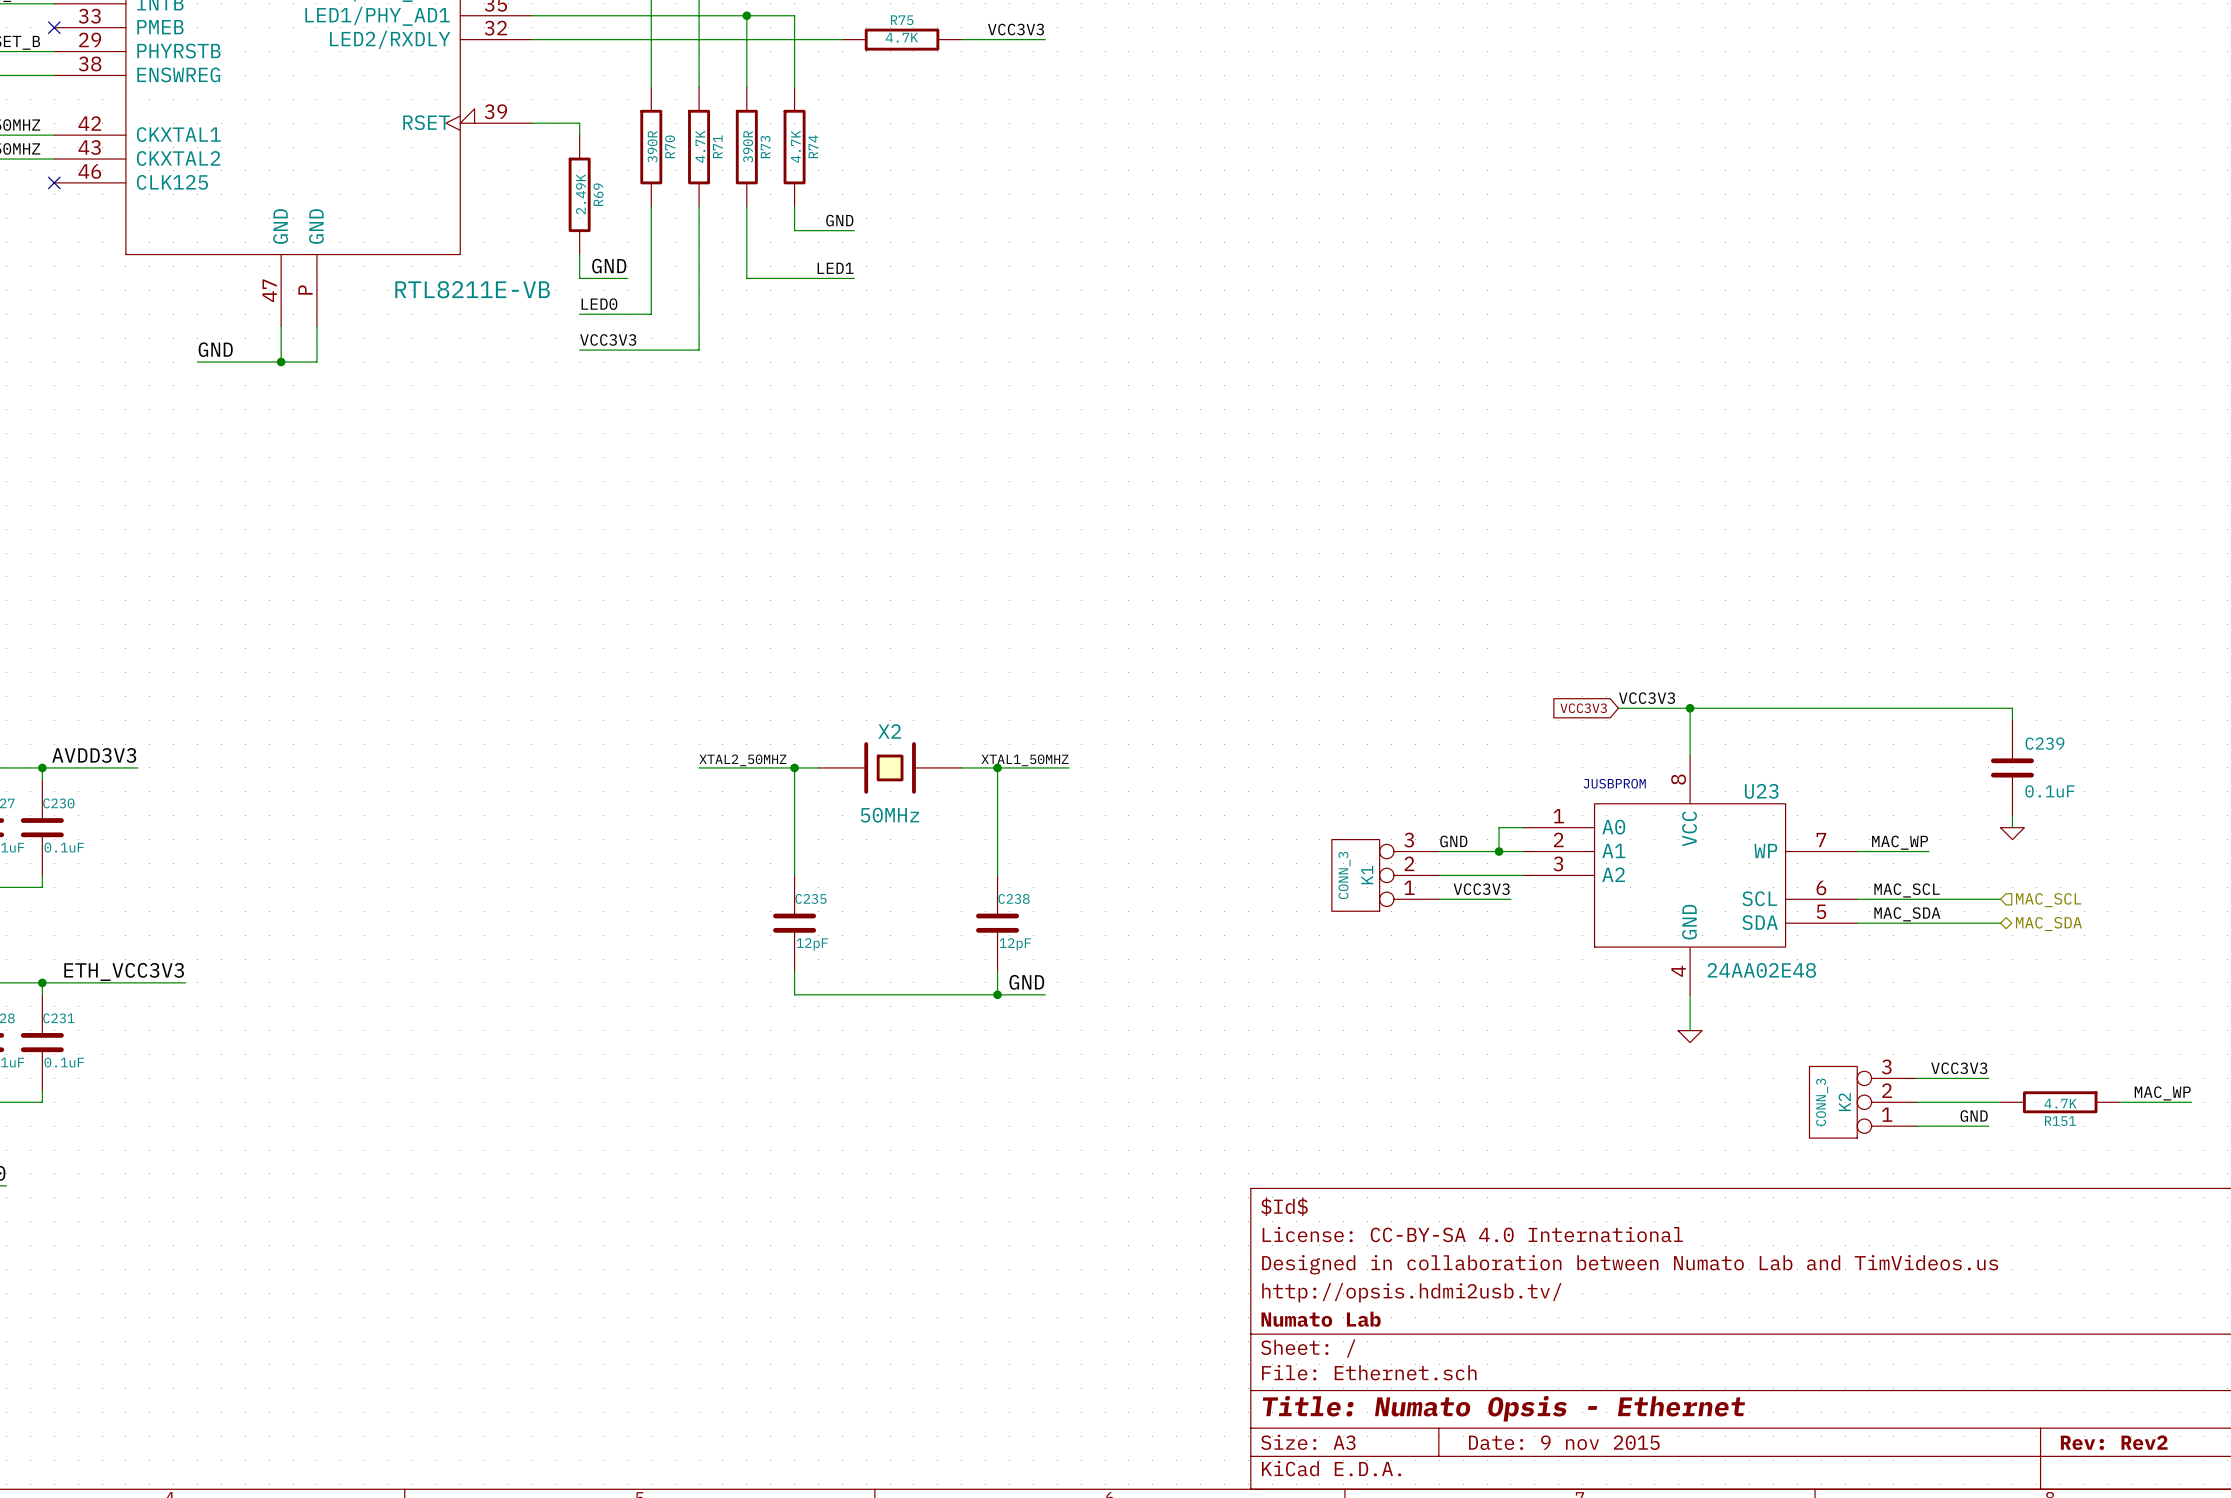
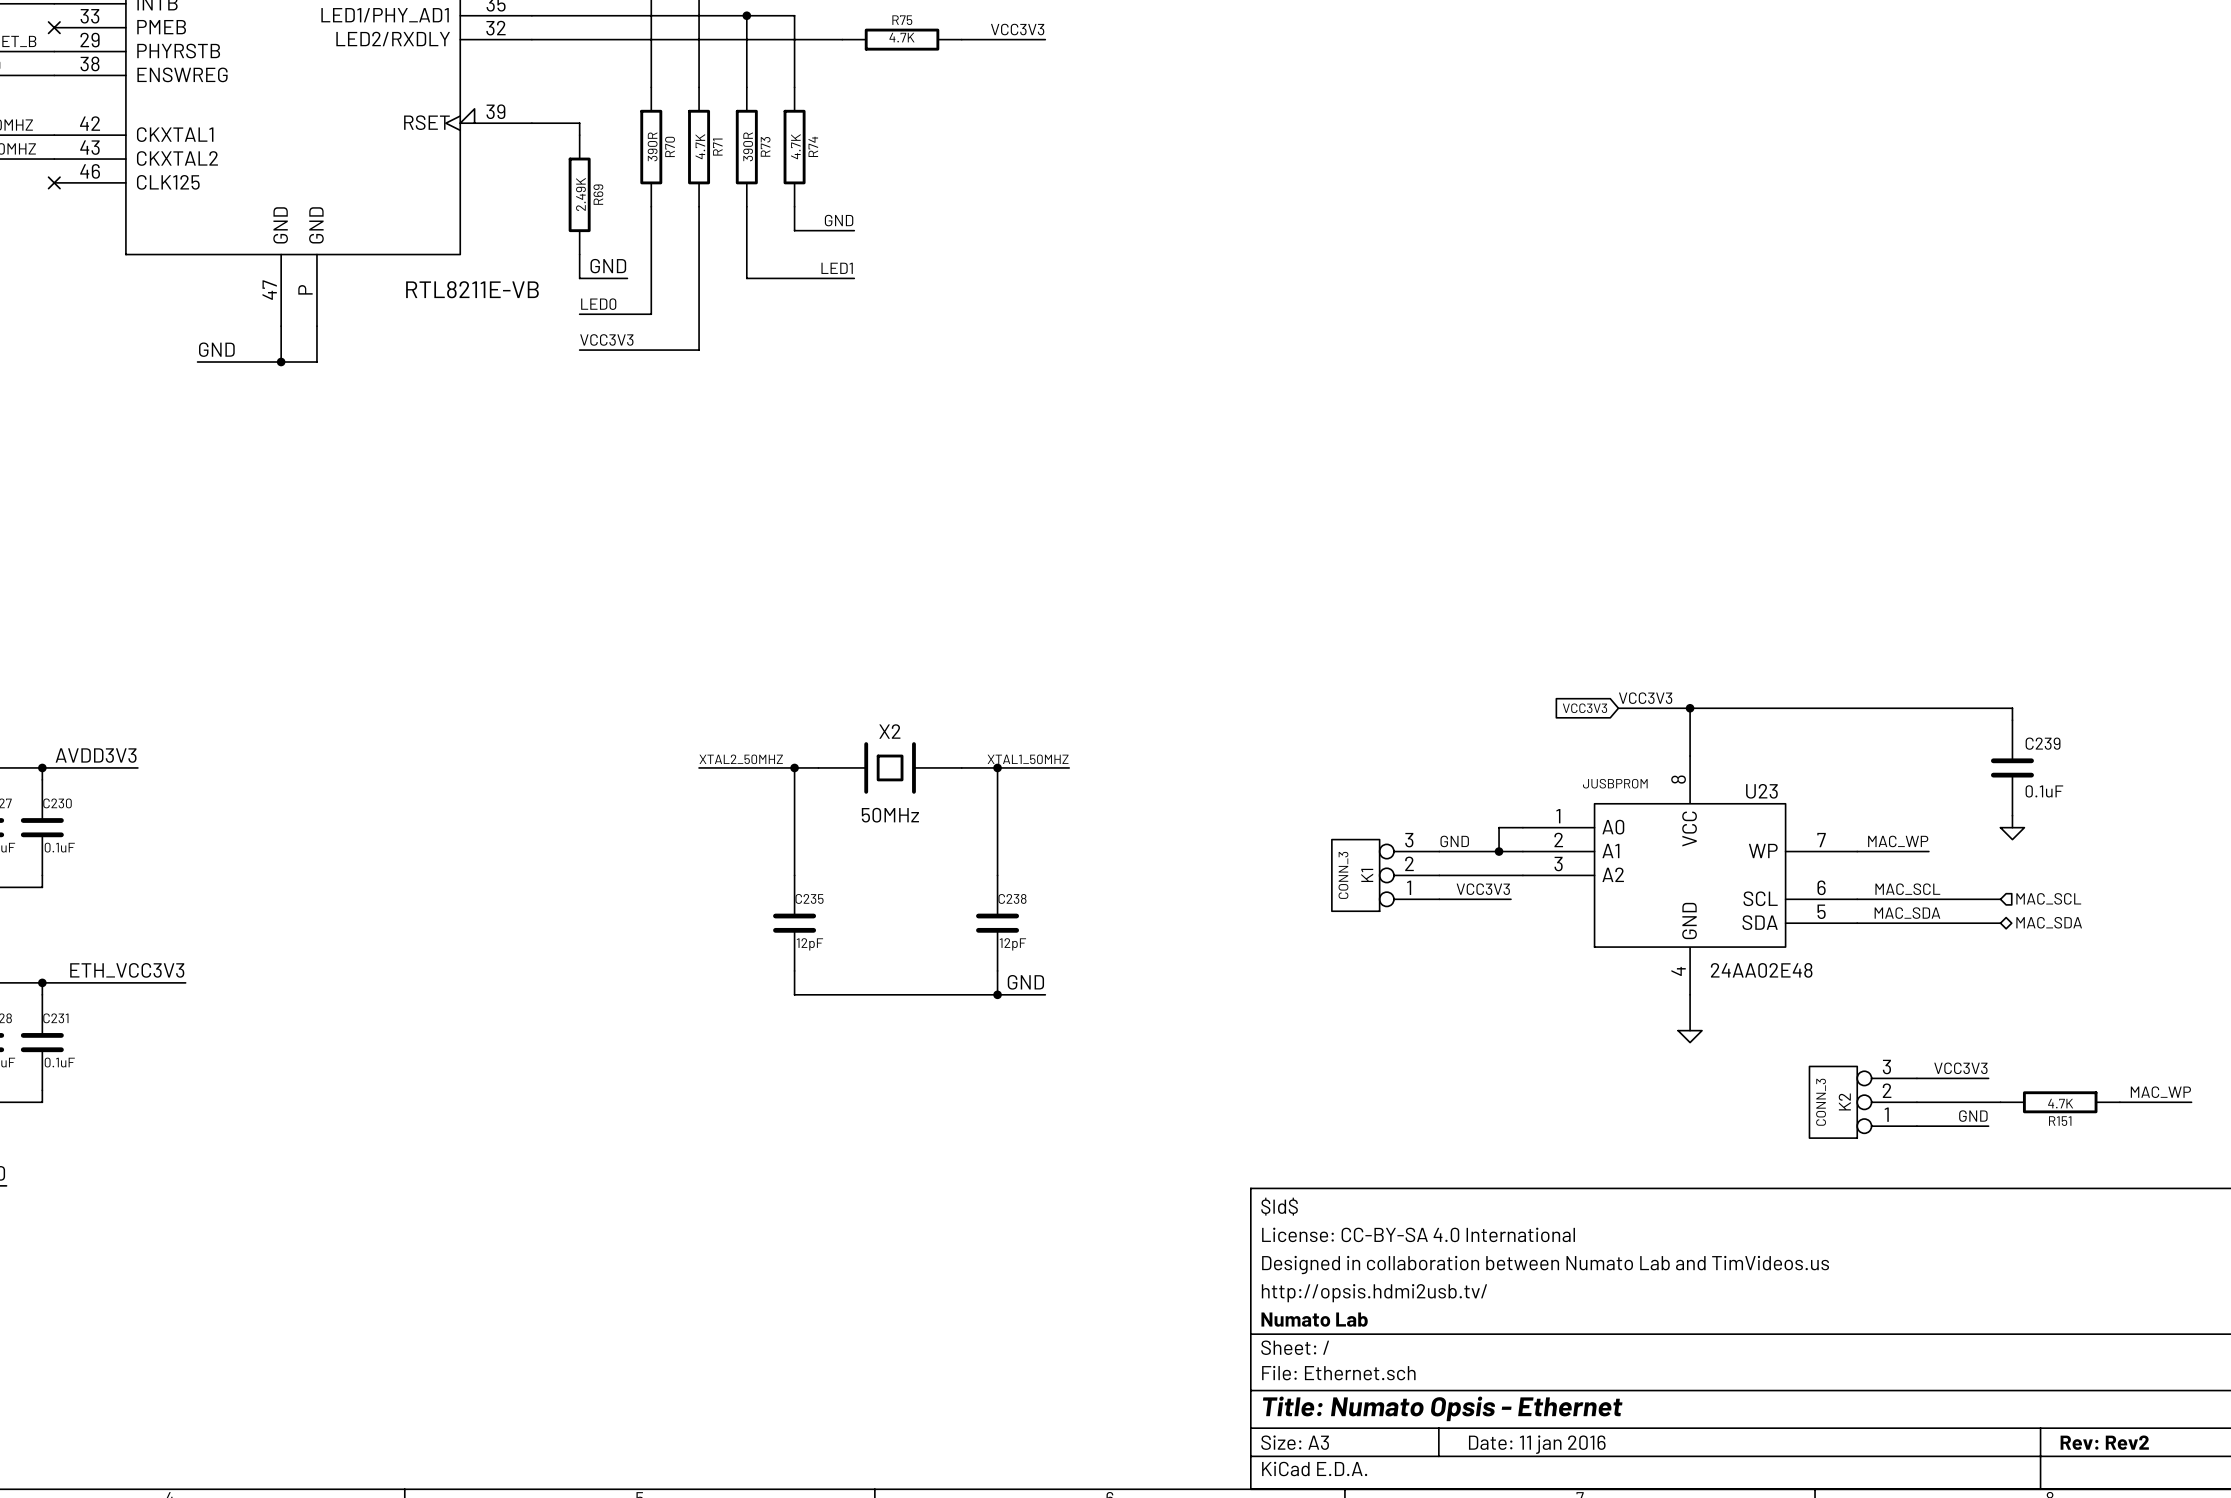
title block: Date: 9 nov 2015 (1564, 1442) -> Date: 11 jan 2016 (1537, 1444)

